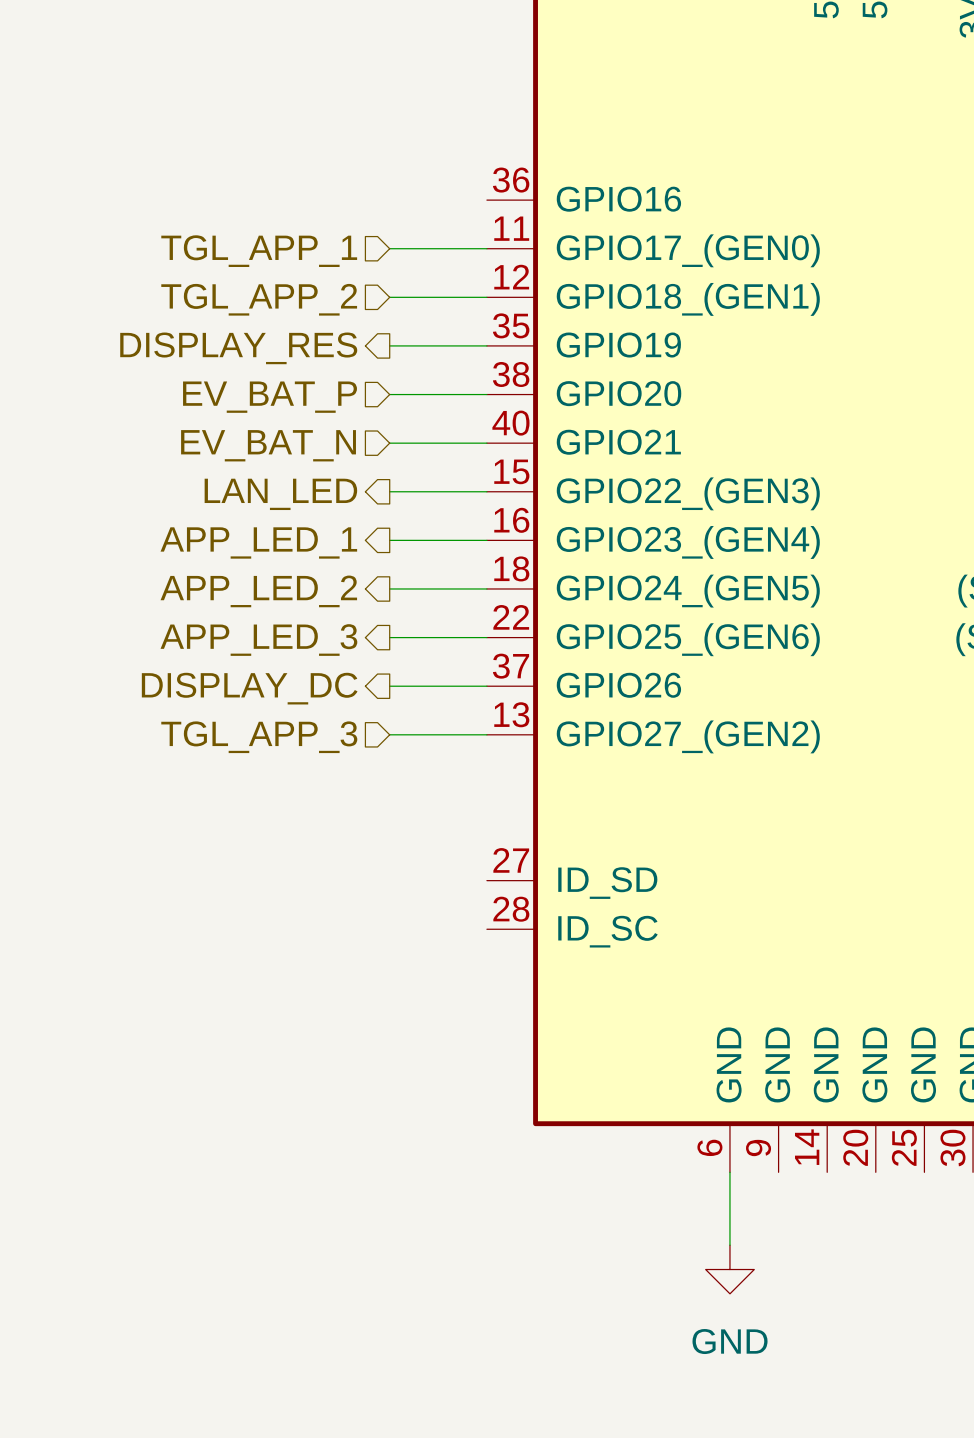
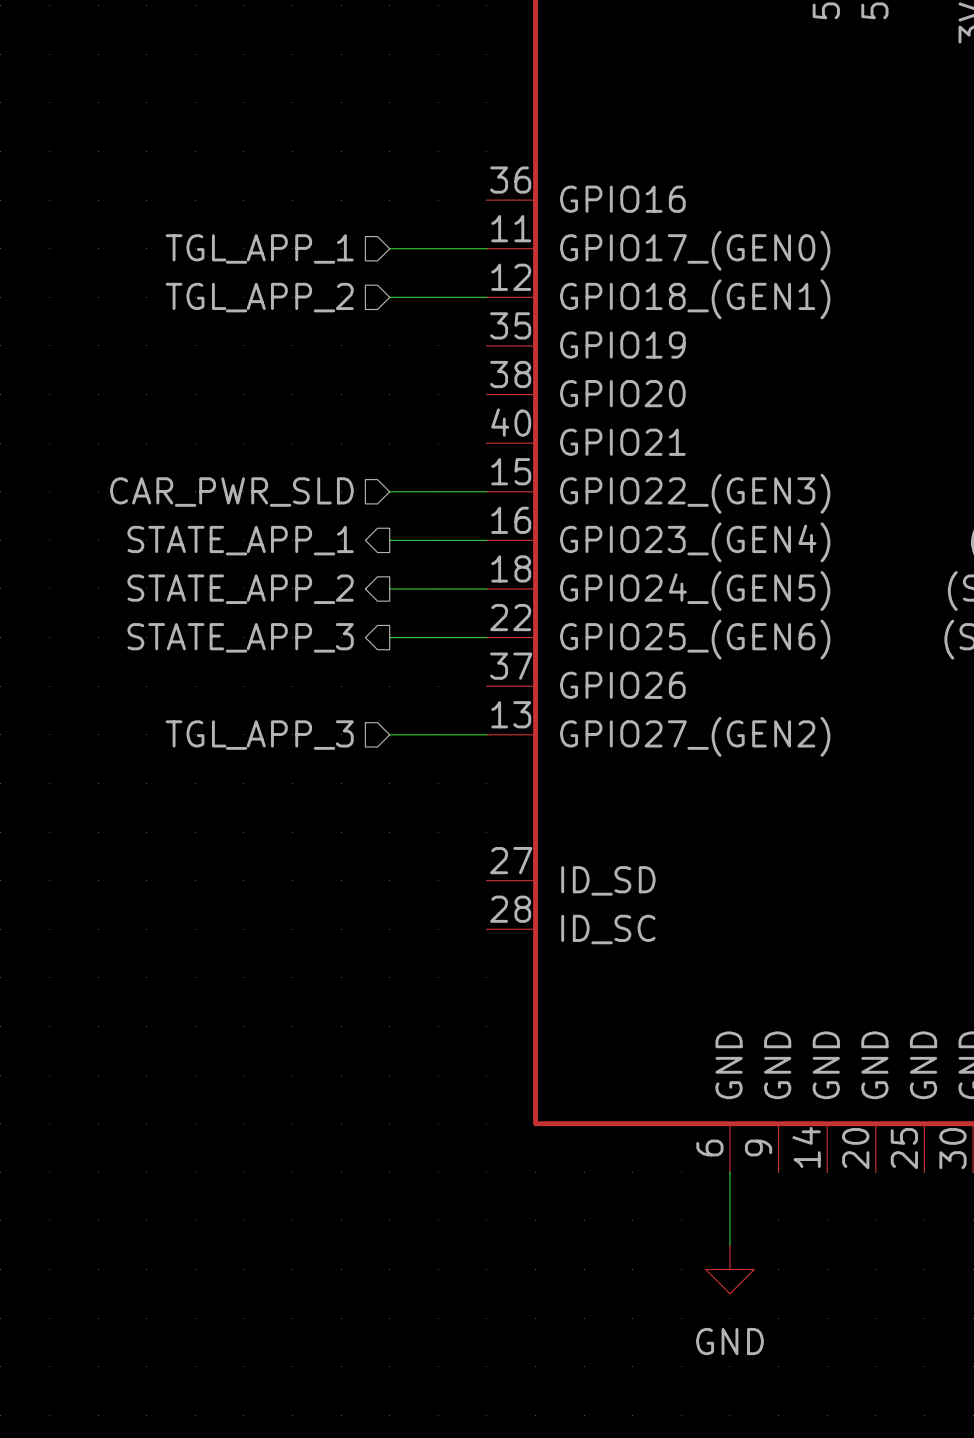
wire: (389, 345) (486, 345) -> none
hierarchical label: DISPLAY_RES (238, 348) -> none
wire: (389, 394) (486, 394) -> none
hierarchical label: EV_BAT_P (270, 397) -> none
wire: (389, 443) (486, 443) -> none
hierarchical label: EV_BAT_N (268, 445) -> none
hierarchical label shape: output (280, 494) -> input (231, 492)
hierarchical label: LAN_LED (280, 494) -> CAR_PWR_SLD (231, 492)
hierarchical label: APP_LED_1 (258, 542) -> STATE_APP_1 (240, 540)
hierarchical label: APP_LED_2 (258, 591) -> STATE_APP_2 (240, 589)
hierarchical label: APP_LED_3 (258, 640) -> STATE_APP_3 (240, 637)
wire: (389, 686) (486, 686) -> none
hierarchical label: DISPLAY_DC (249, 688) -> none

